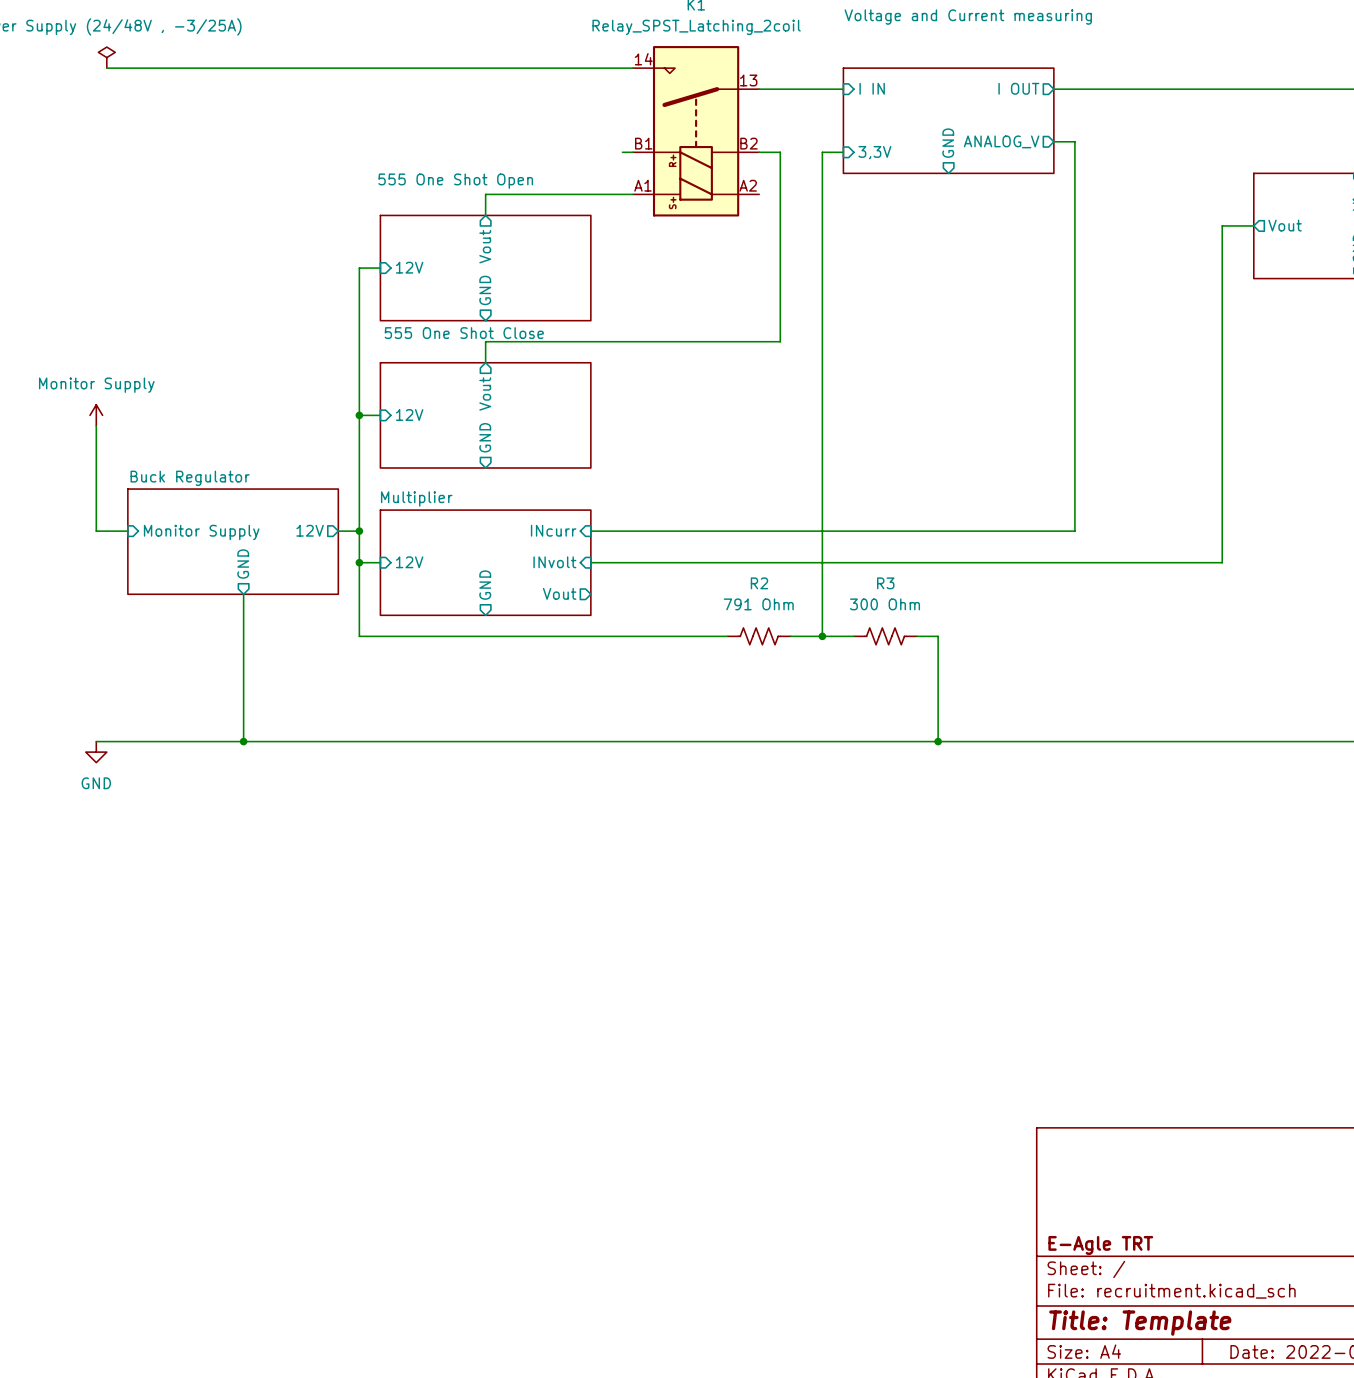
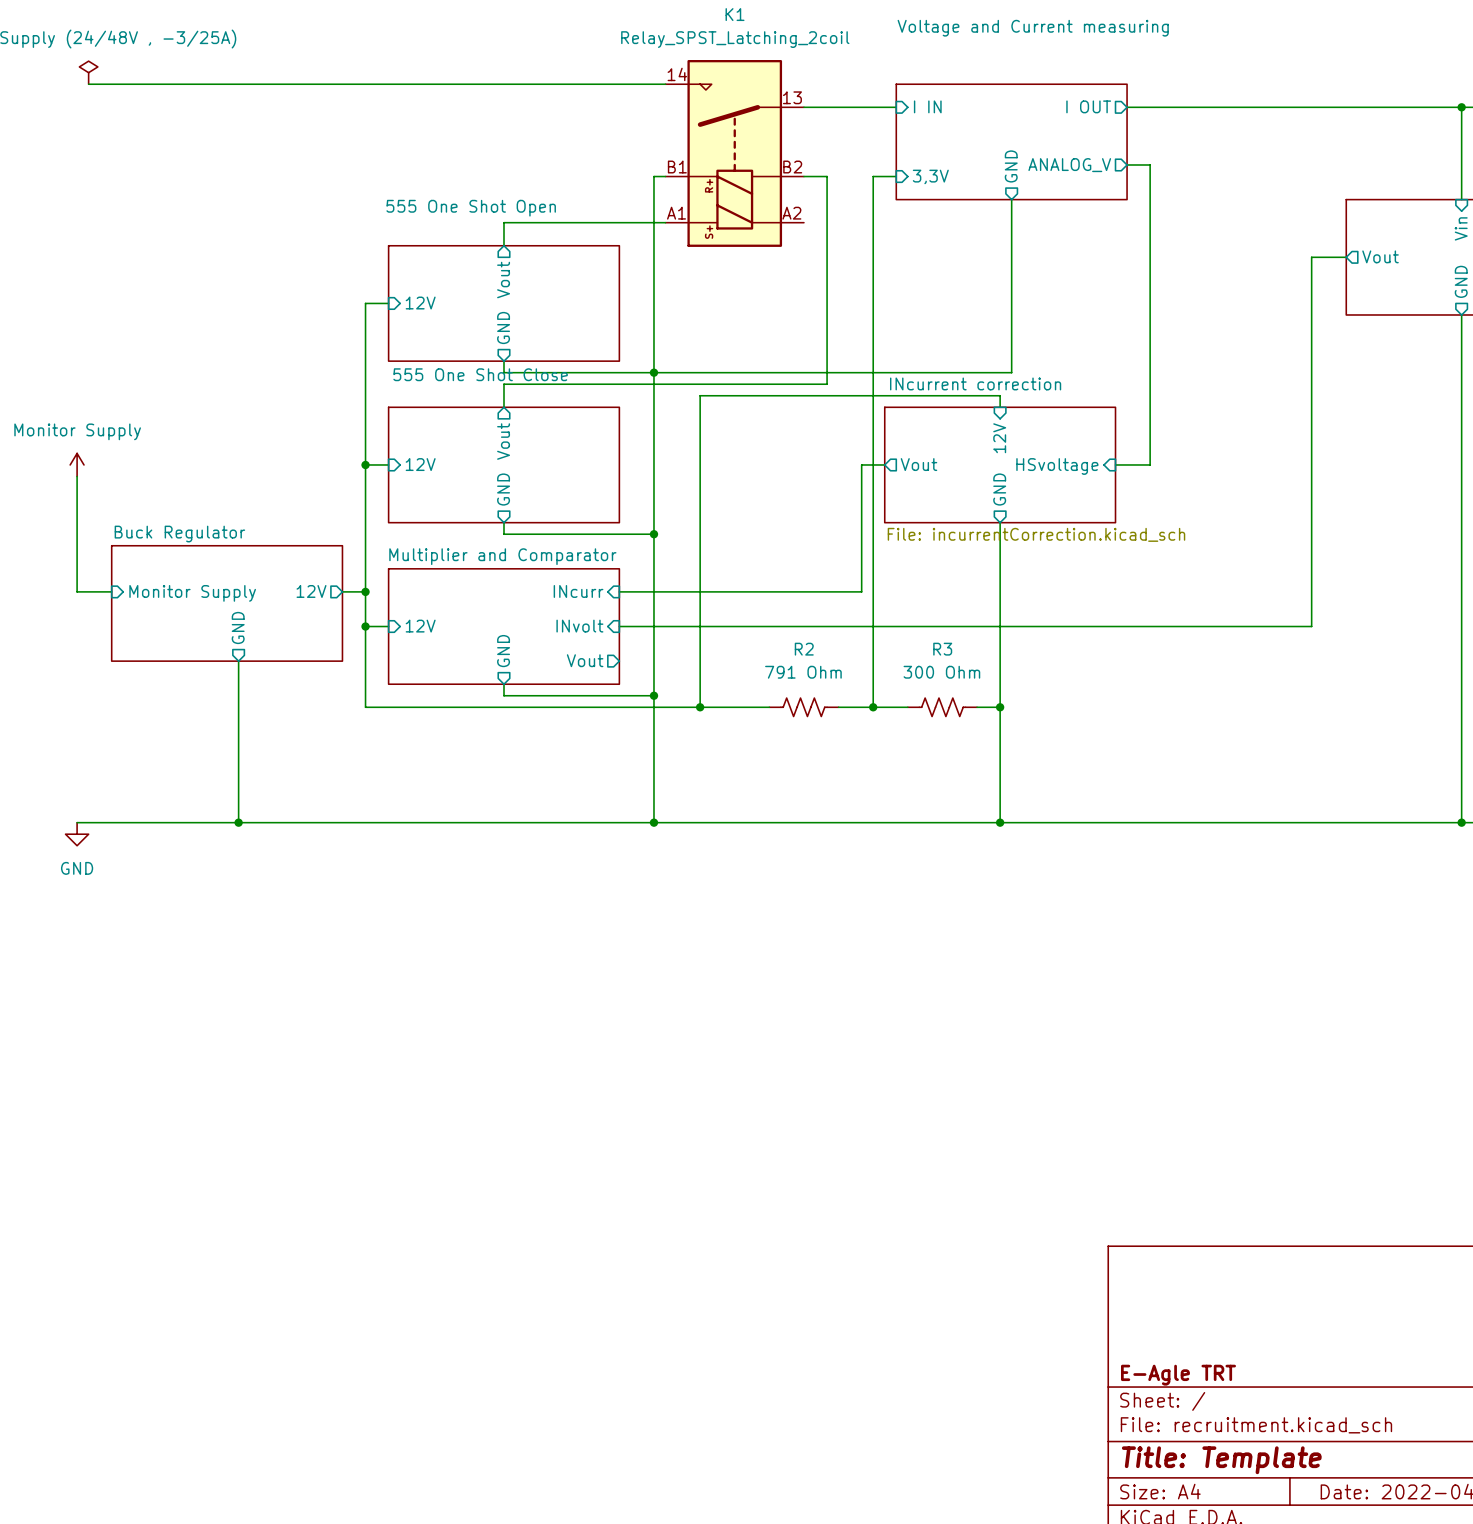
wire: none -> (653, 176) (653, 822)
wire: none -> (1011, 199) (1011, 372) (503, 372) (503, 361)
junction: none -> (653, 372)
wire: none -> (1000, 407) (1000, 395) (700, 395) (700, 707)
sheet pin: none -> 12V (999, 438)
sheet pin: none -> Vout (918, 464)
sheet INcurrent correction: none -> File: incurrentCorrection.kicad_sch (1000, 464)
wire: none -> (1115, 464) (1150, 464)
wire: (1074, 415) (1074, 531) (811, 531) -> (884, 464) (861, 464) (861, 591)
sheet pin: none -> HSvoltage (1057, 466)
sheet pin: none -> GND (999, 489)
wire: none -> (503, 522) (503, 534) (653, 534)
wire: none -> (1000, 522) (1000, 707)
junction: none -> (653, 534)
sheet Multiplier name: Multiplier (416, 498) -> Multiplier and Comparator (502, 556)
wire: none -> (503, 684) (503, 695) (653, 695)
junction: none -> (653, 695)
junction: none -> (700, 707)
junction: none -> (1000, 707)
junction: none -> (653, 822)

